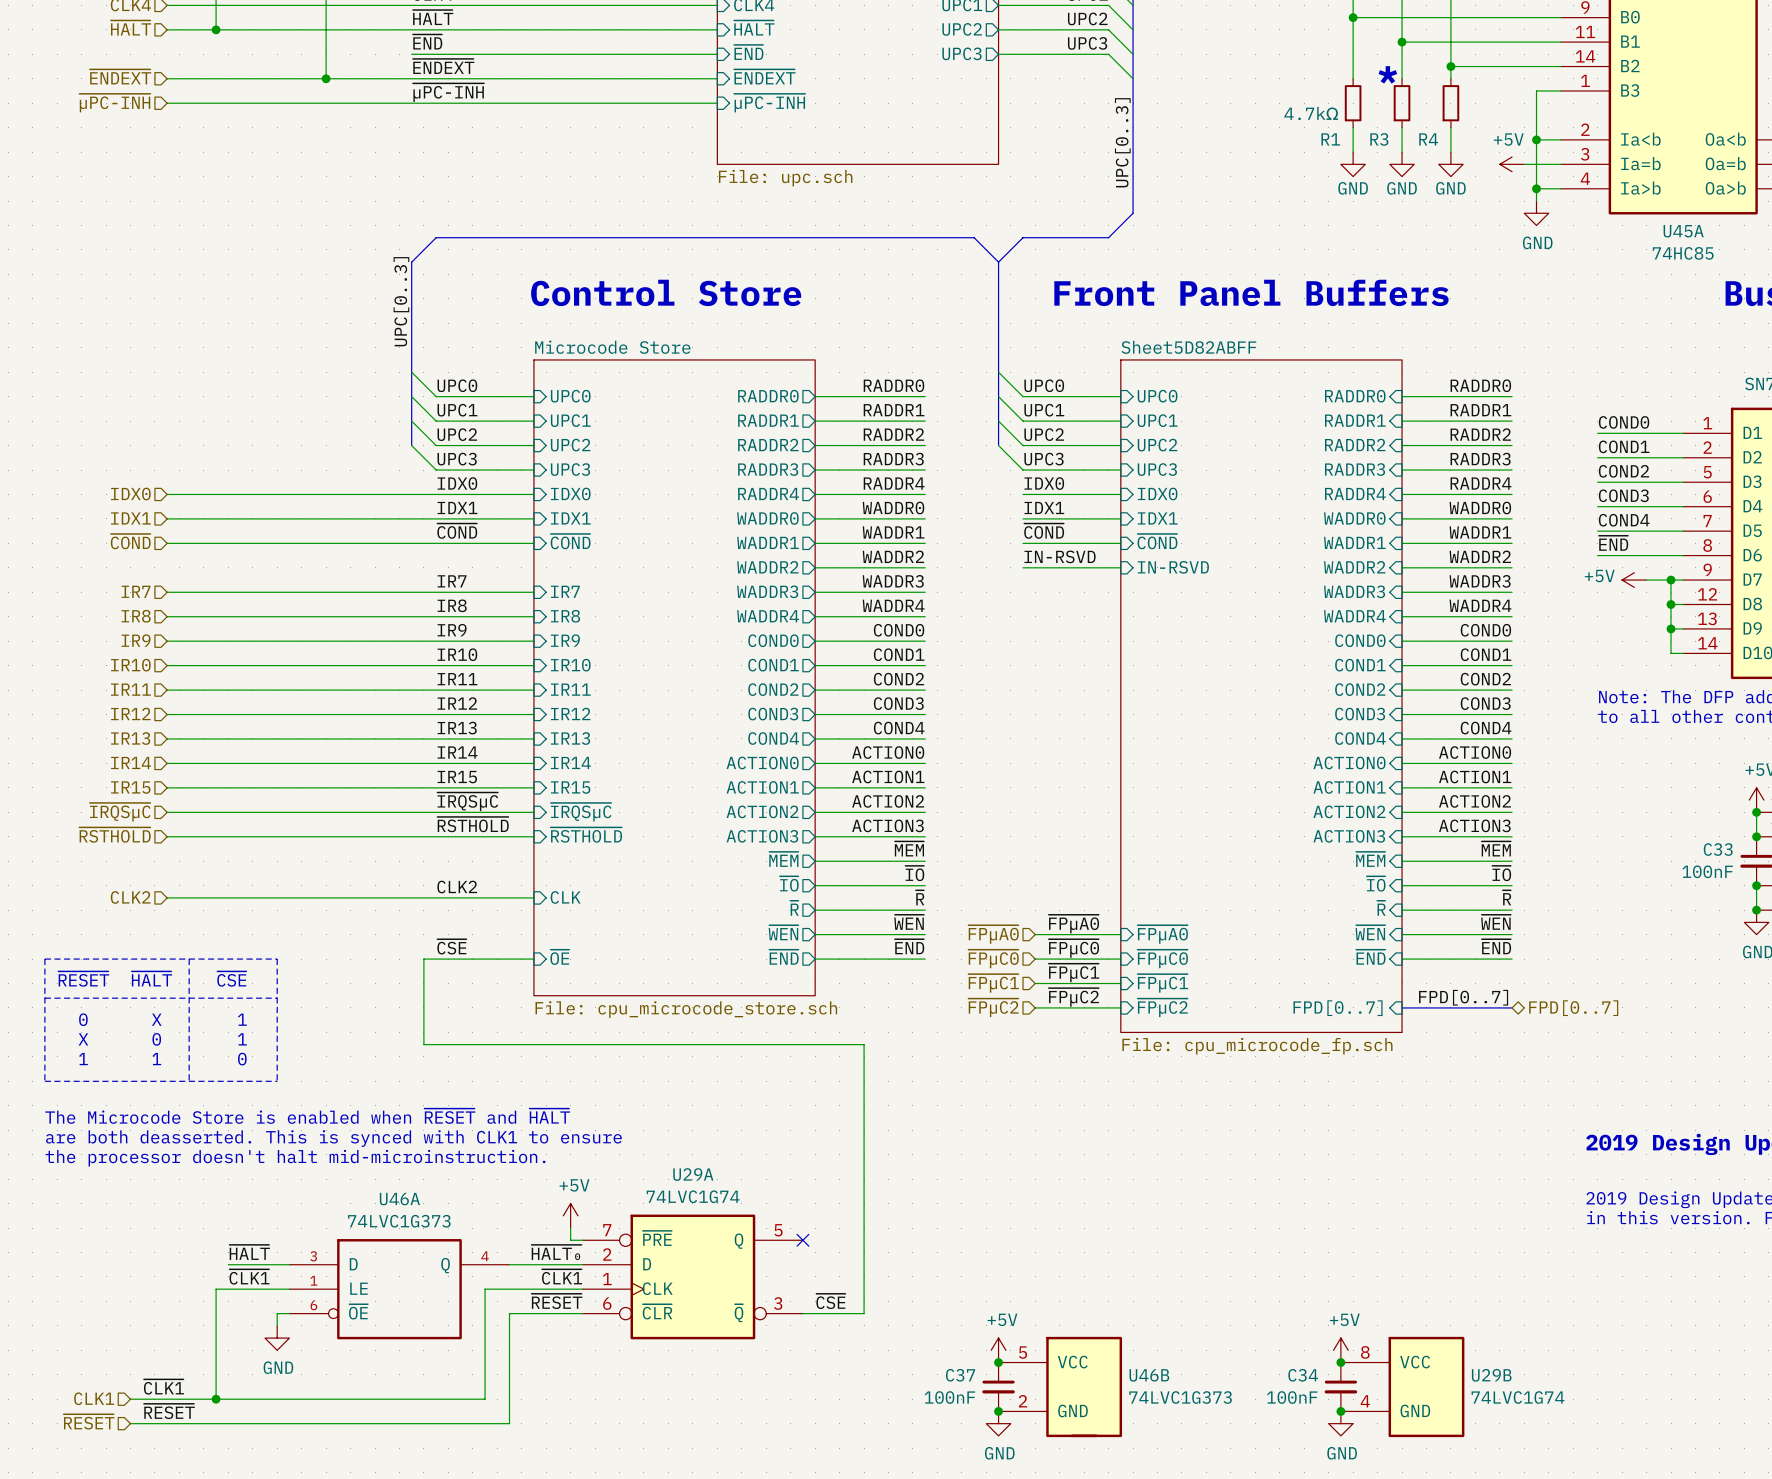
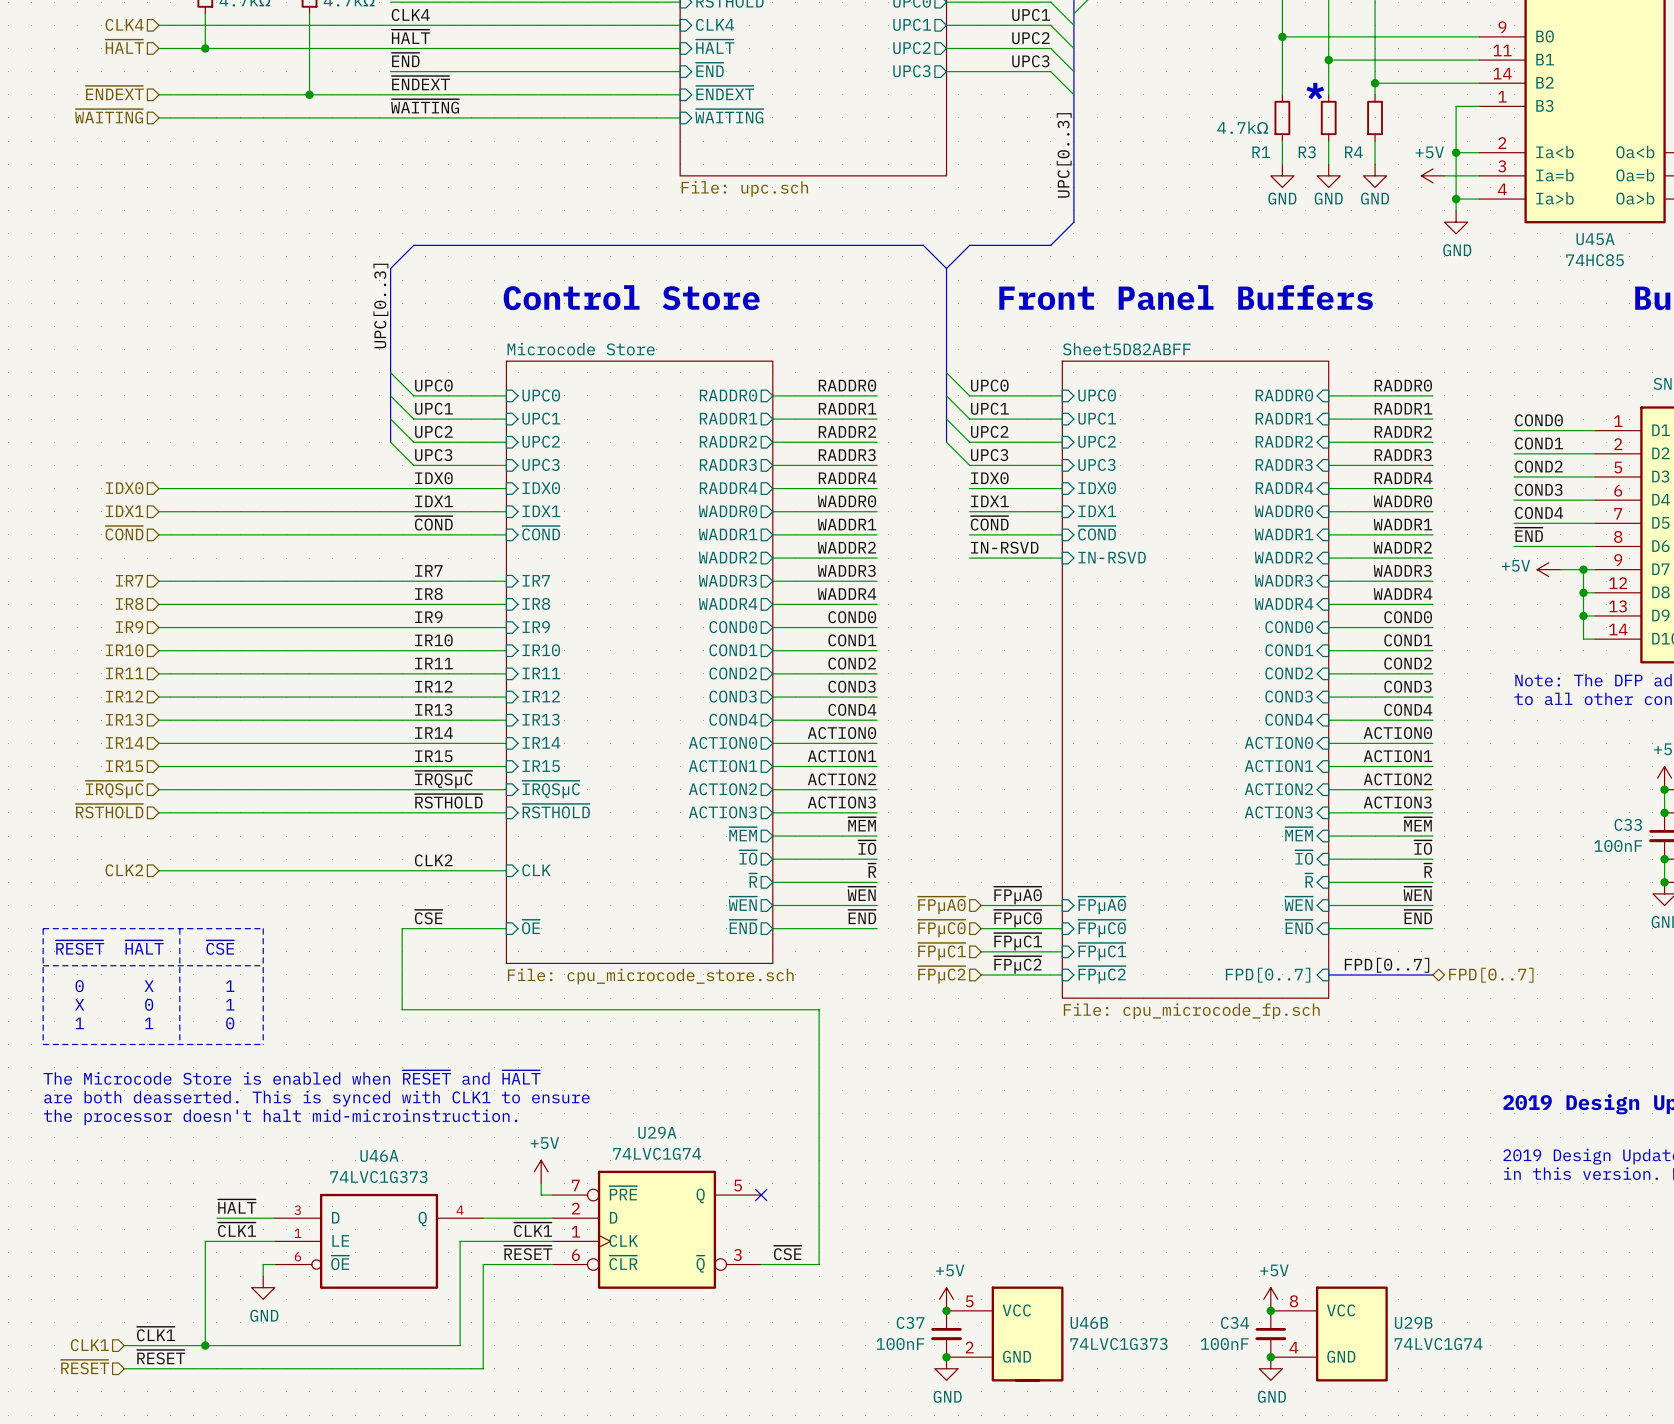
label: ~{µPC-INH} (448, 92) -> ~{WAITING} (425, 106)
hierarchical label: ~{µPC-INH} (114, 103) -> ~{WAITING} (109, 116)
sheet pin: ~{µPC-INH} (769, 103) -> ~{WAITING} (729, 116)
label: ~{HALT₀} (556, 1252) -> none

